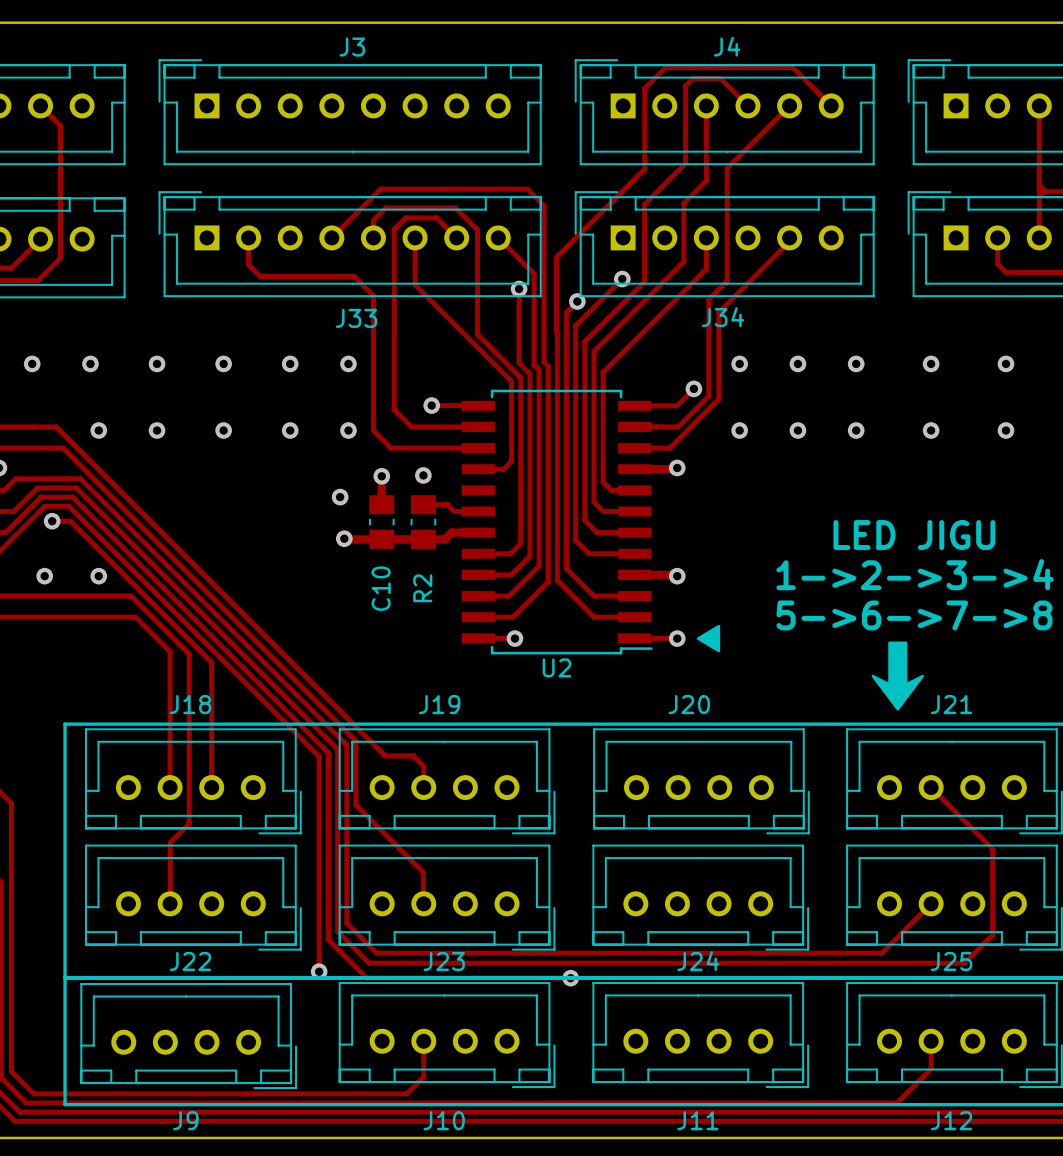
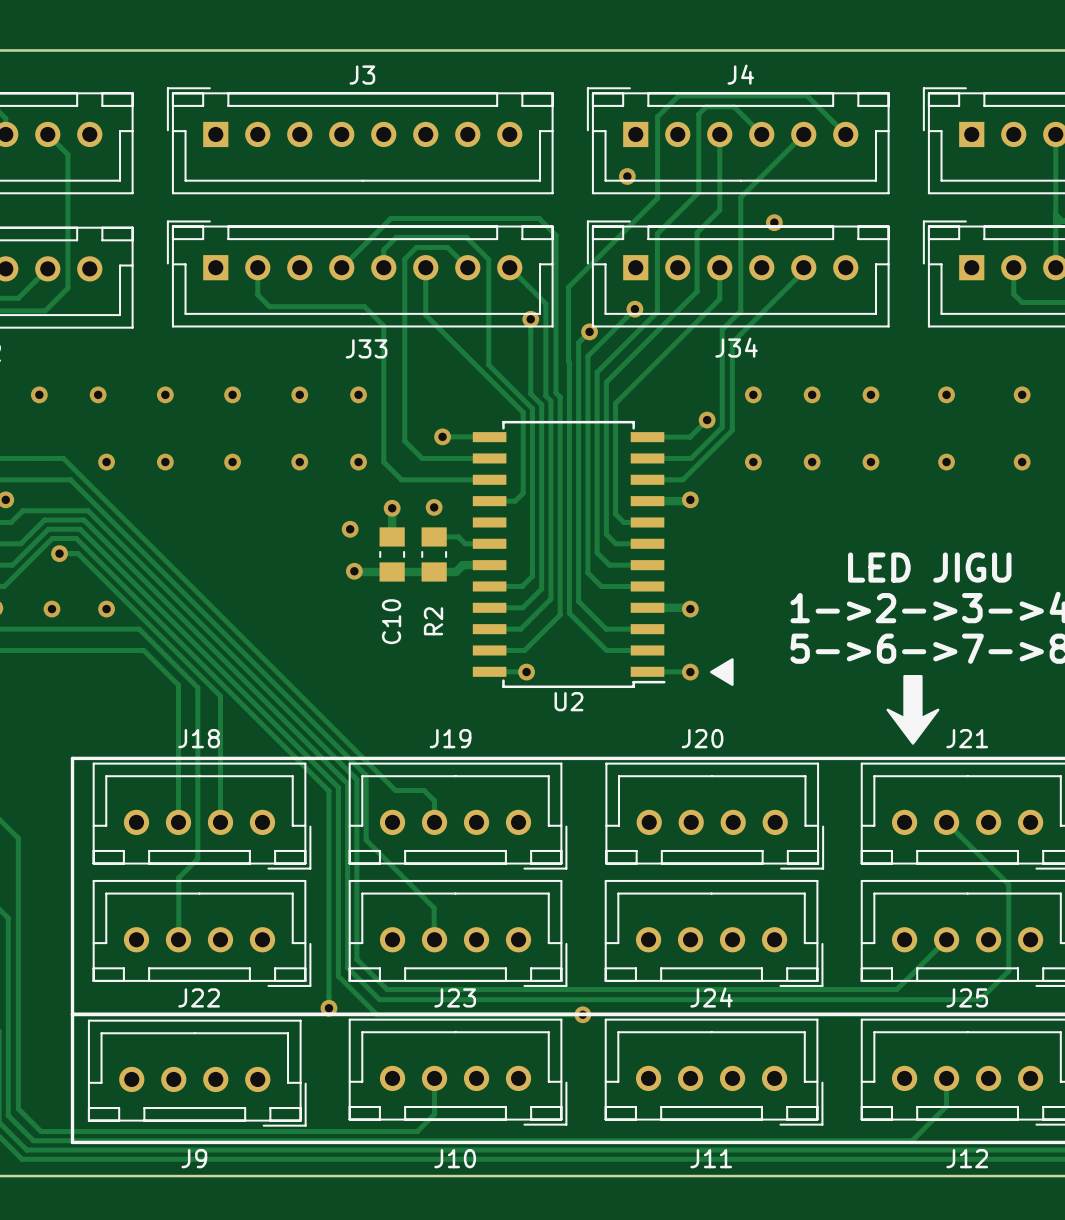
via: none -> (627, 176)
via: none -> (774, 222)

